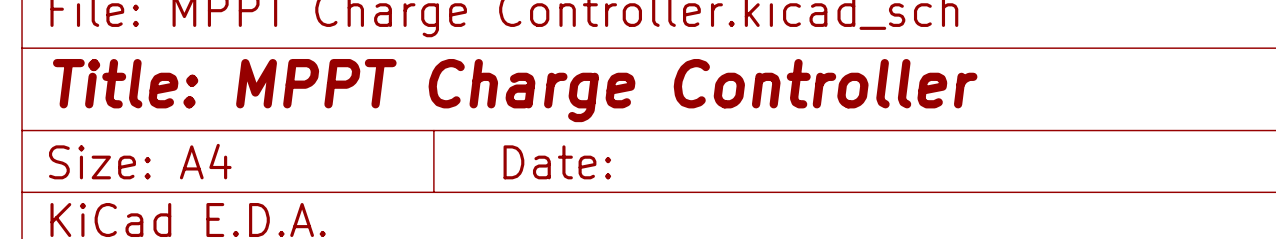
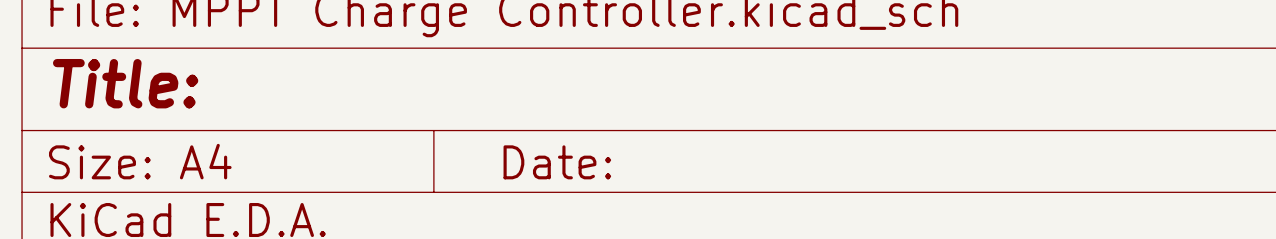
title block: Title: MPPT Charge Controller (515, 90) -> Title: (125, 83)

